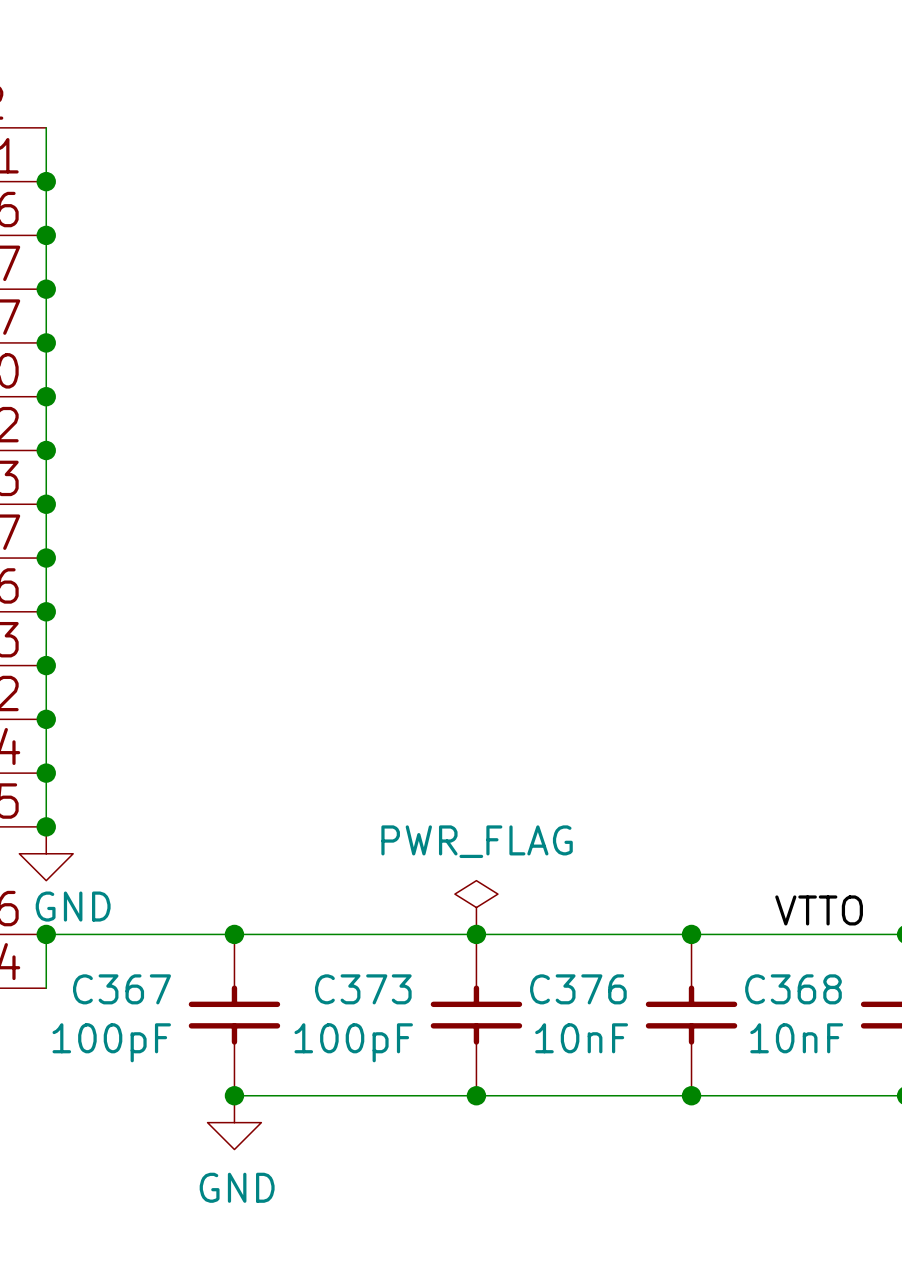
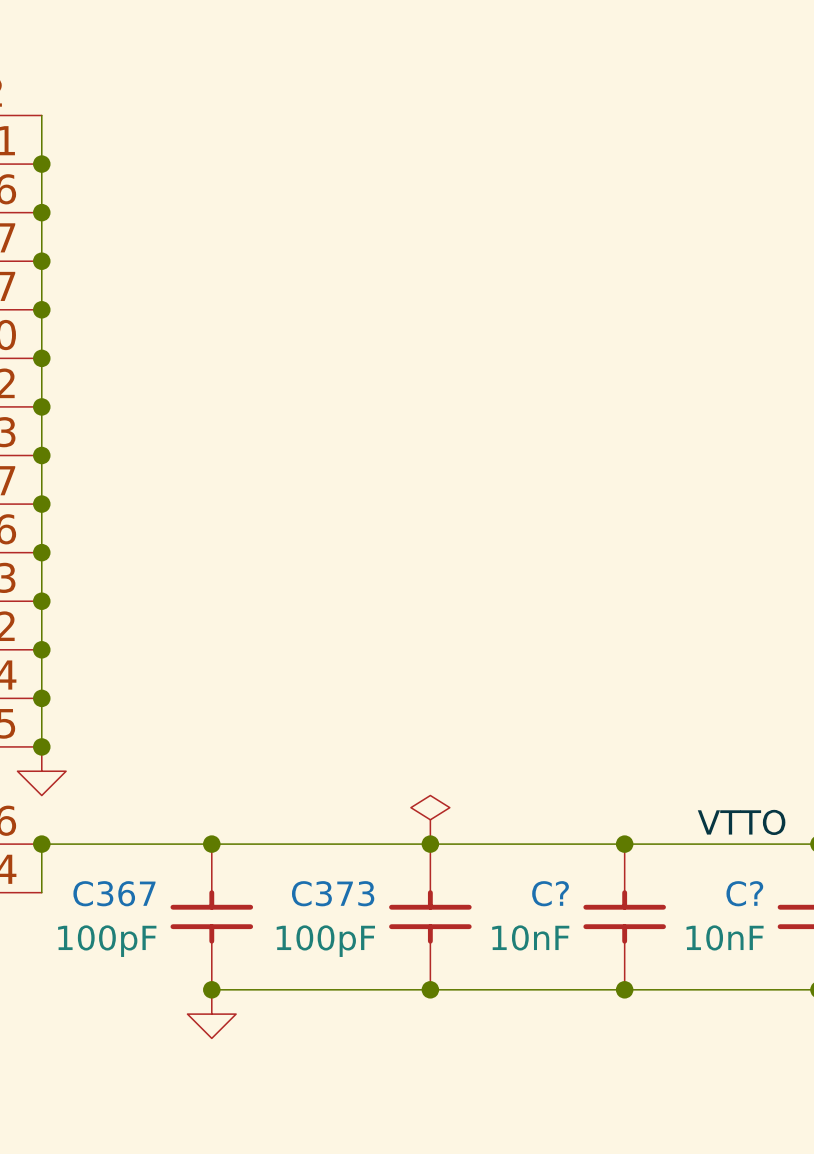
power symbol text: PWR_FLAG (477, 841) -> none
power symbol text: GND (73, 906) -> none
C376 name: C376 (578, 989) -> C? (550, 893)
C368 name: C368 (793, 989) -> C? (744, 893)
power symbol text: GND (237, 1187) -> none

